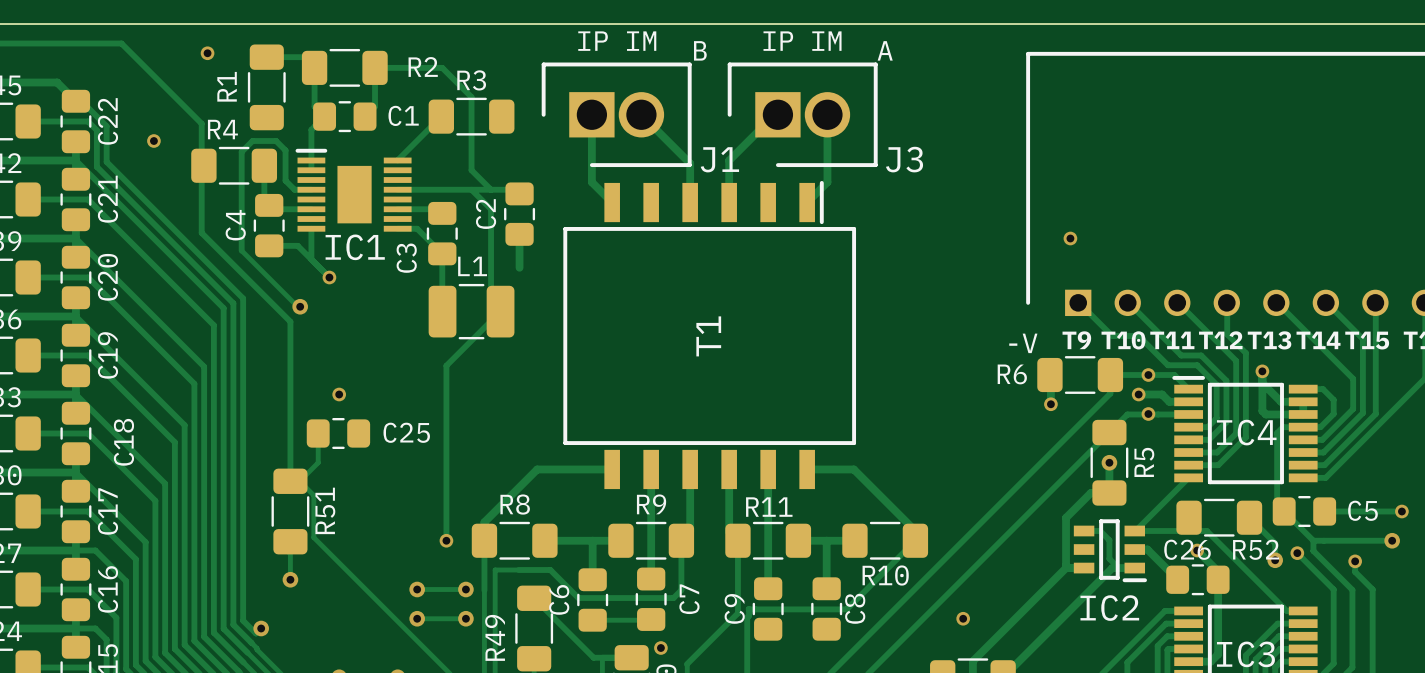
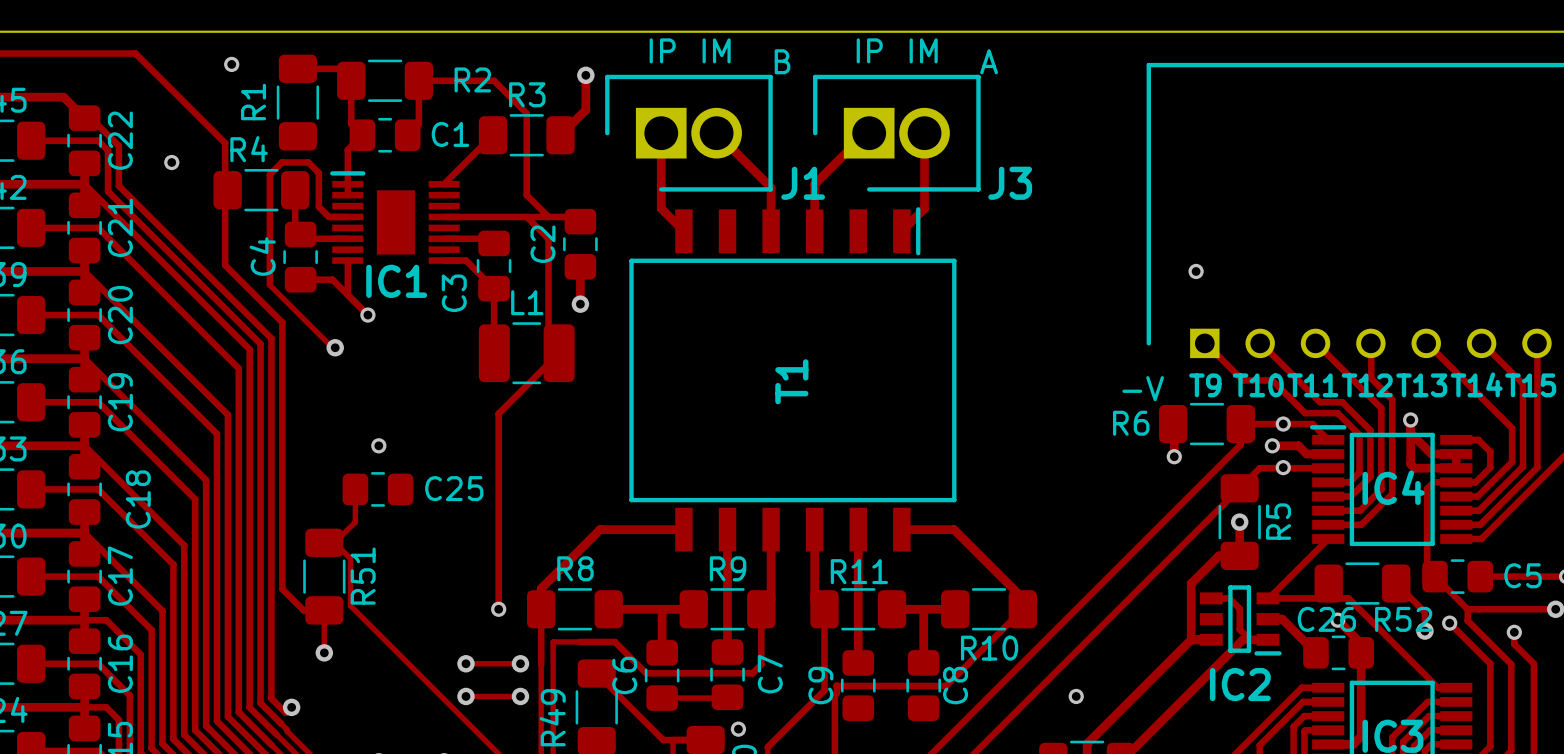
track: none -> (585, 75) (585, 109) (560, 135)
via: none -> (585, 75)
via: none -> (580, 304)
track: (252, 284) (290, 321) (290, 491) -> (282, 322) (282, 589) (303, 610) (324, 610)

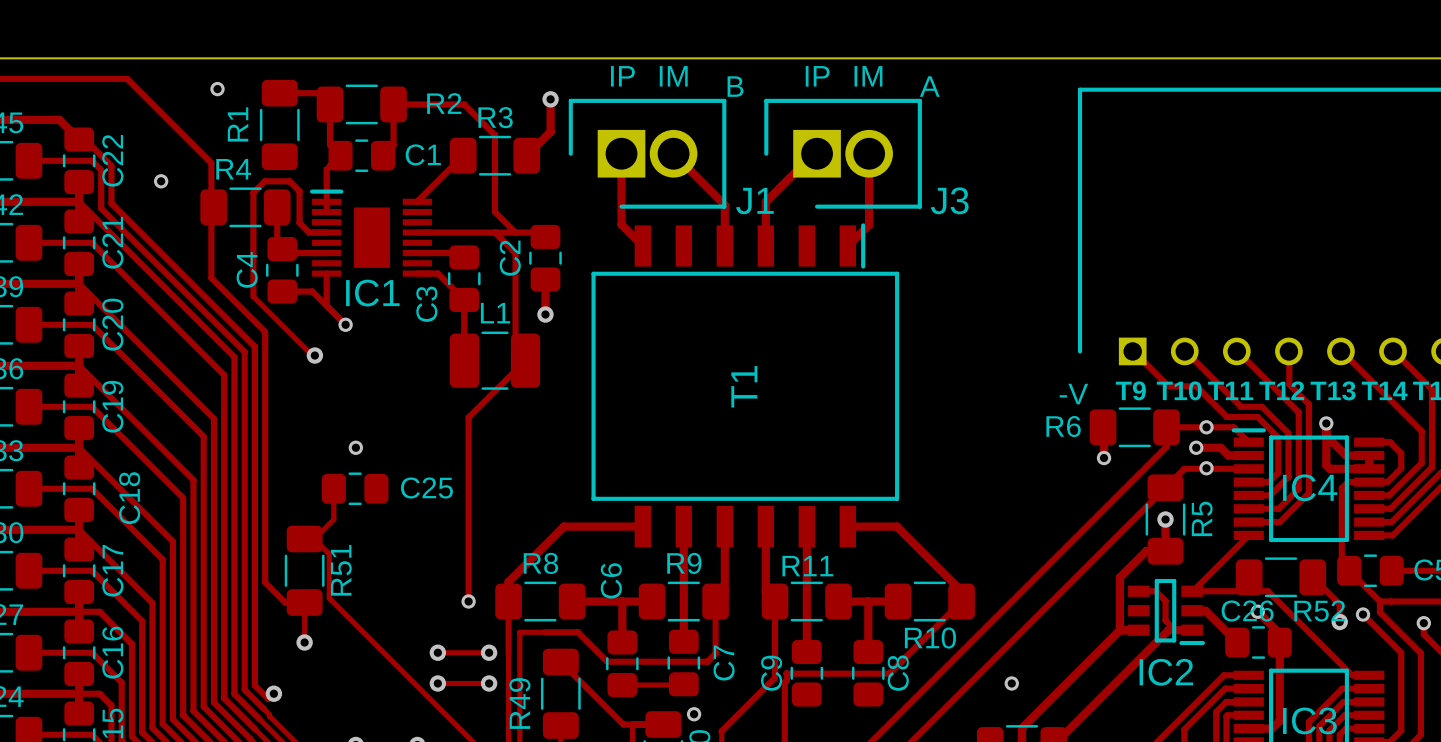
via: (1196, 271) -> none
C6 name position: C6 (624, 675) -> C6 (611, 580)

